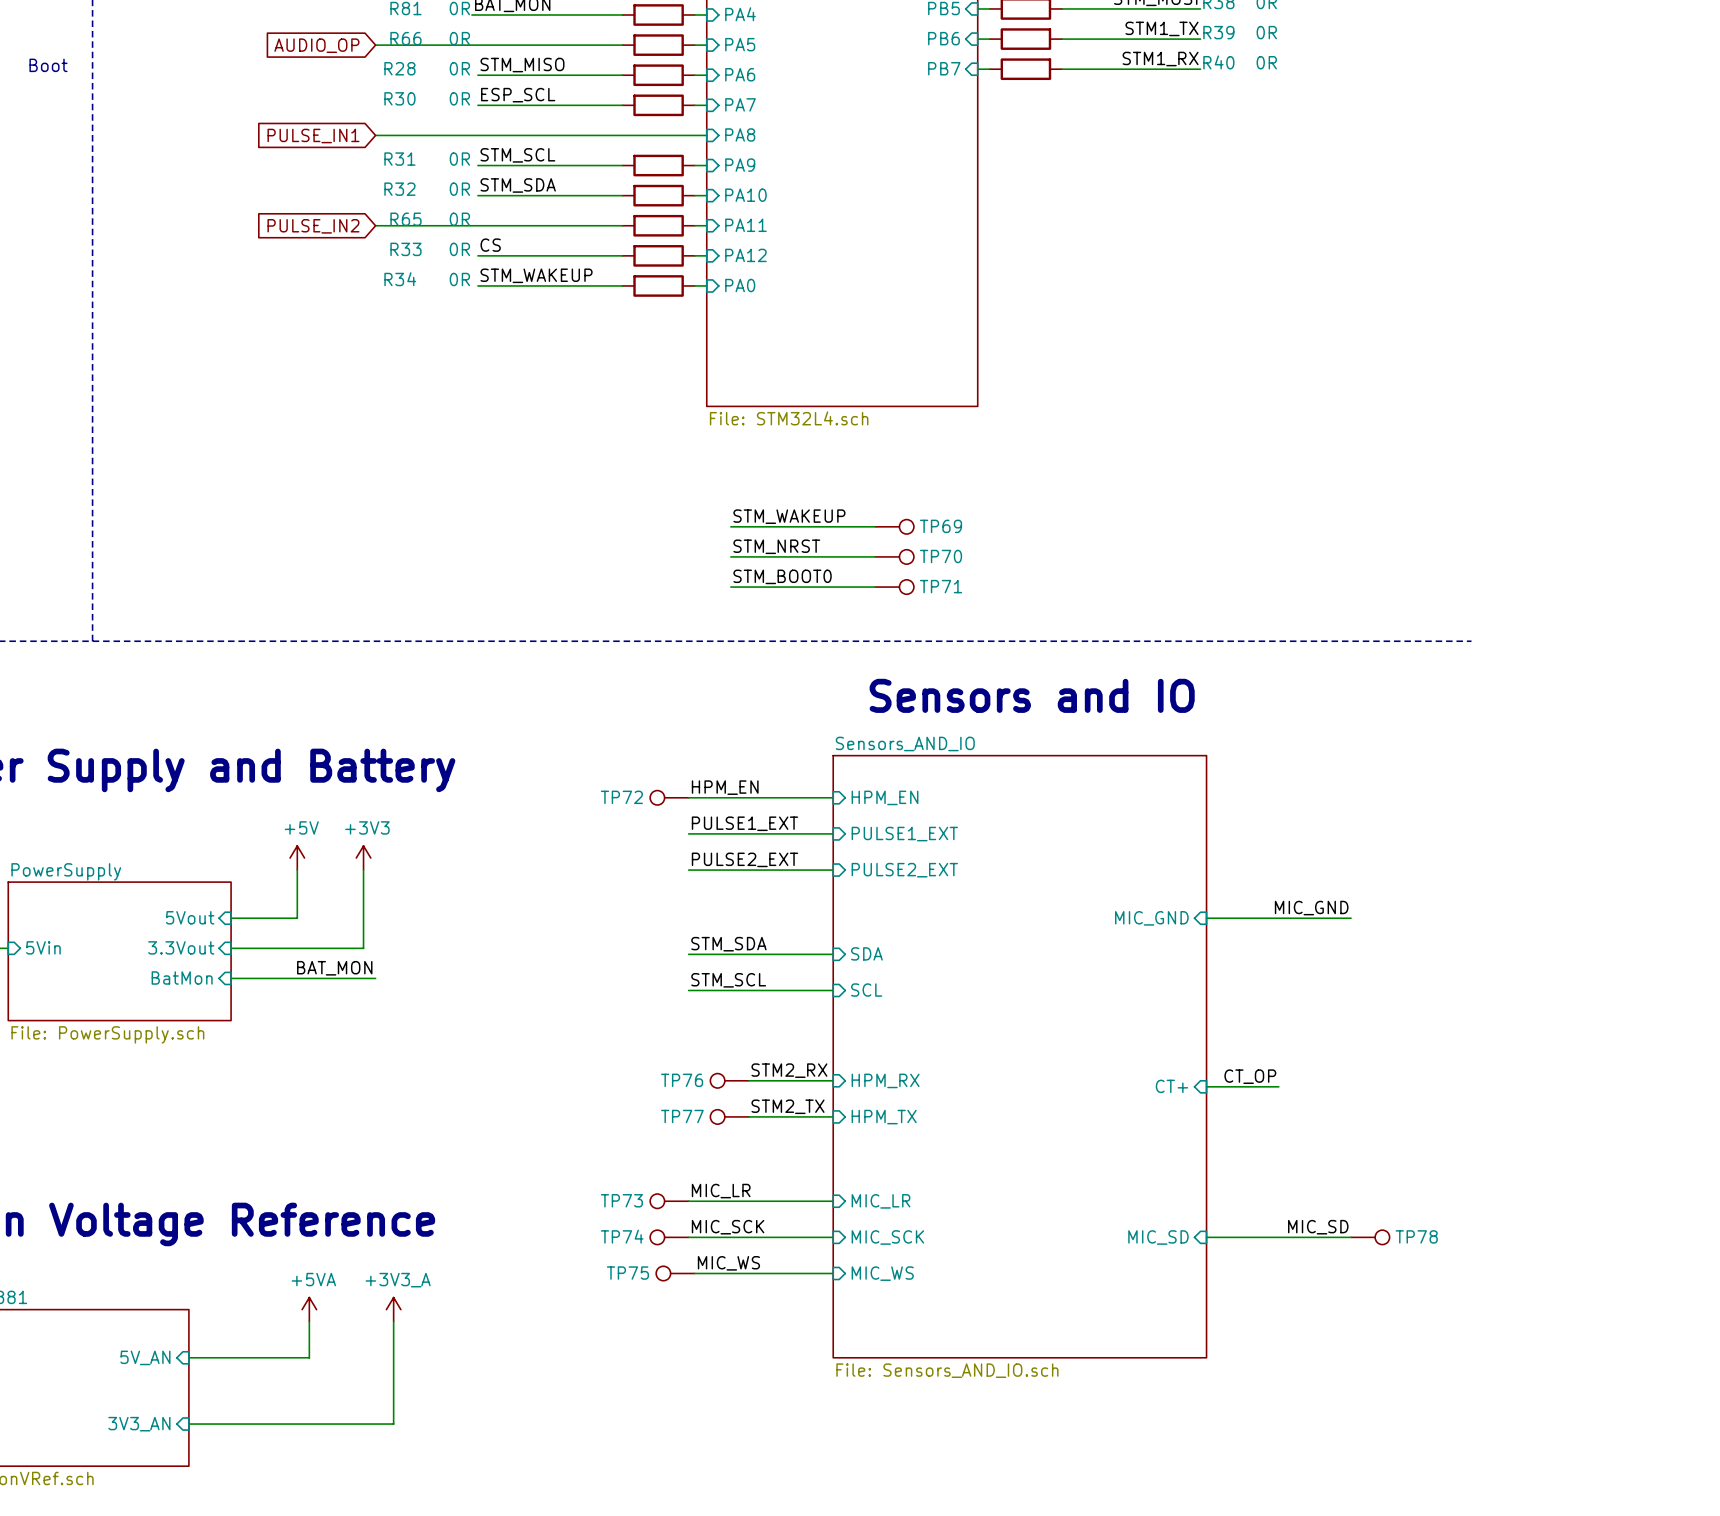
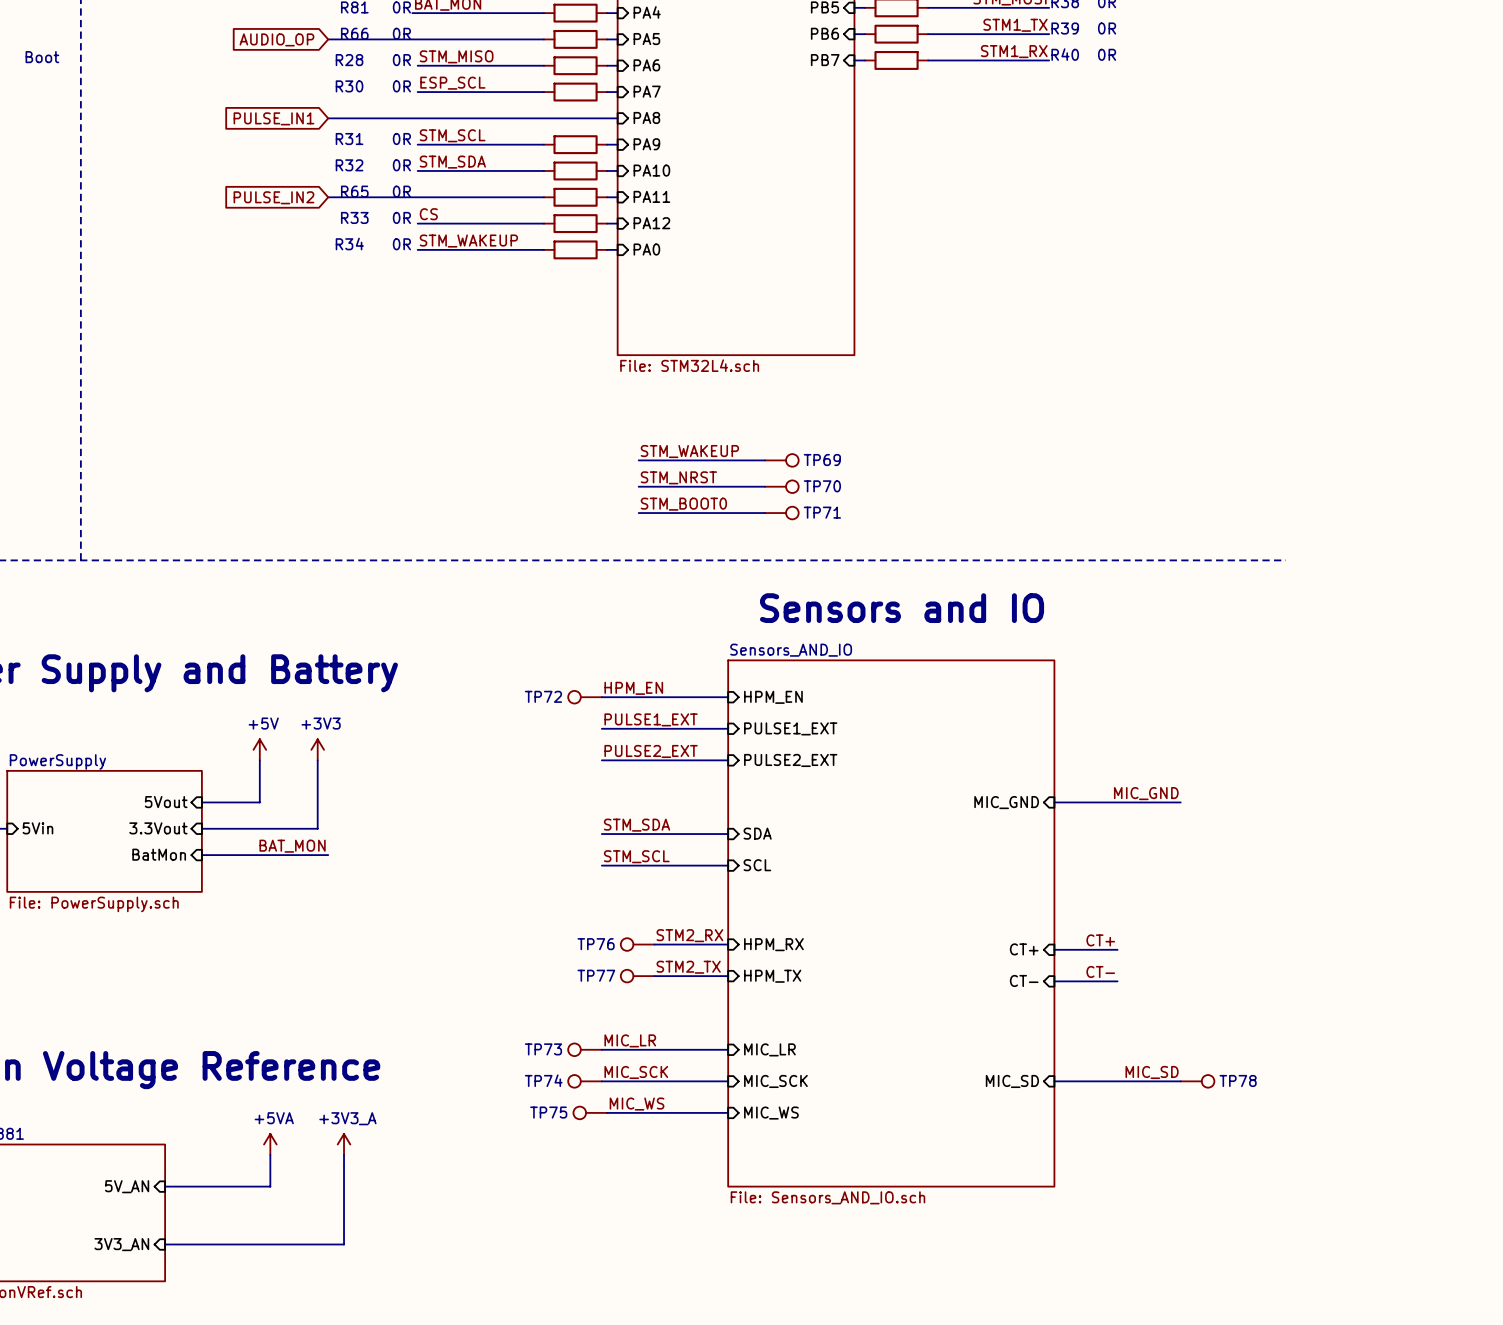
label: CT_OP (1250, 1076) -> CT+ (1100, 940)
label: none -> CT- (1100, 971)
sheet pin: none -> CT- (1024, 980)
wire: none -> (1054, 981) (1117, 981)

